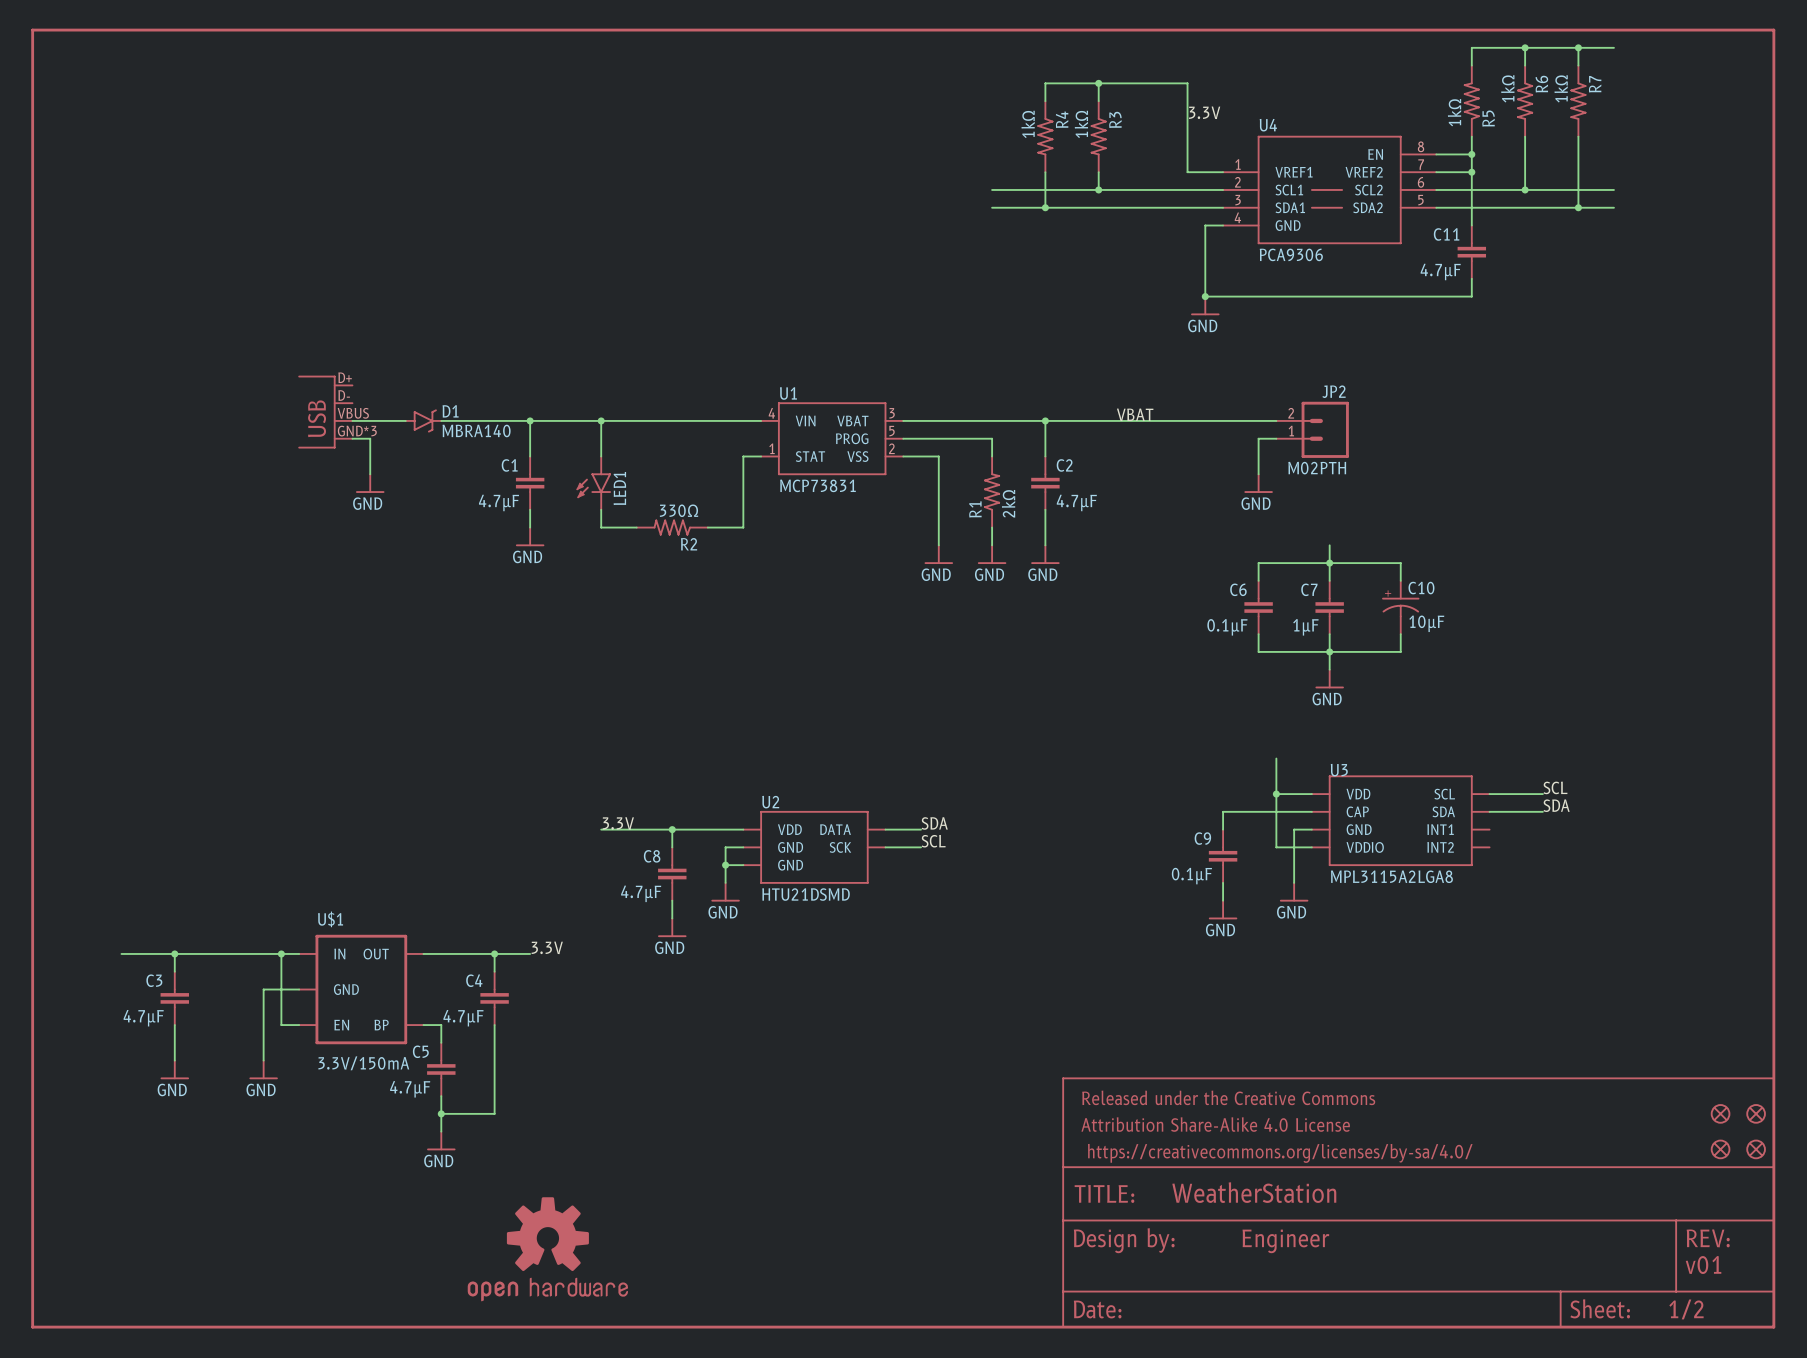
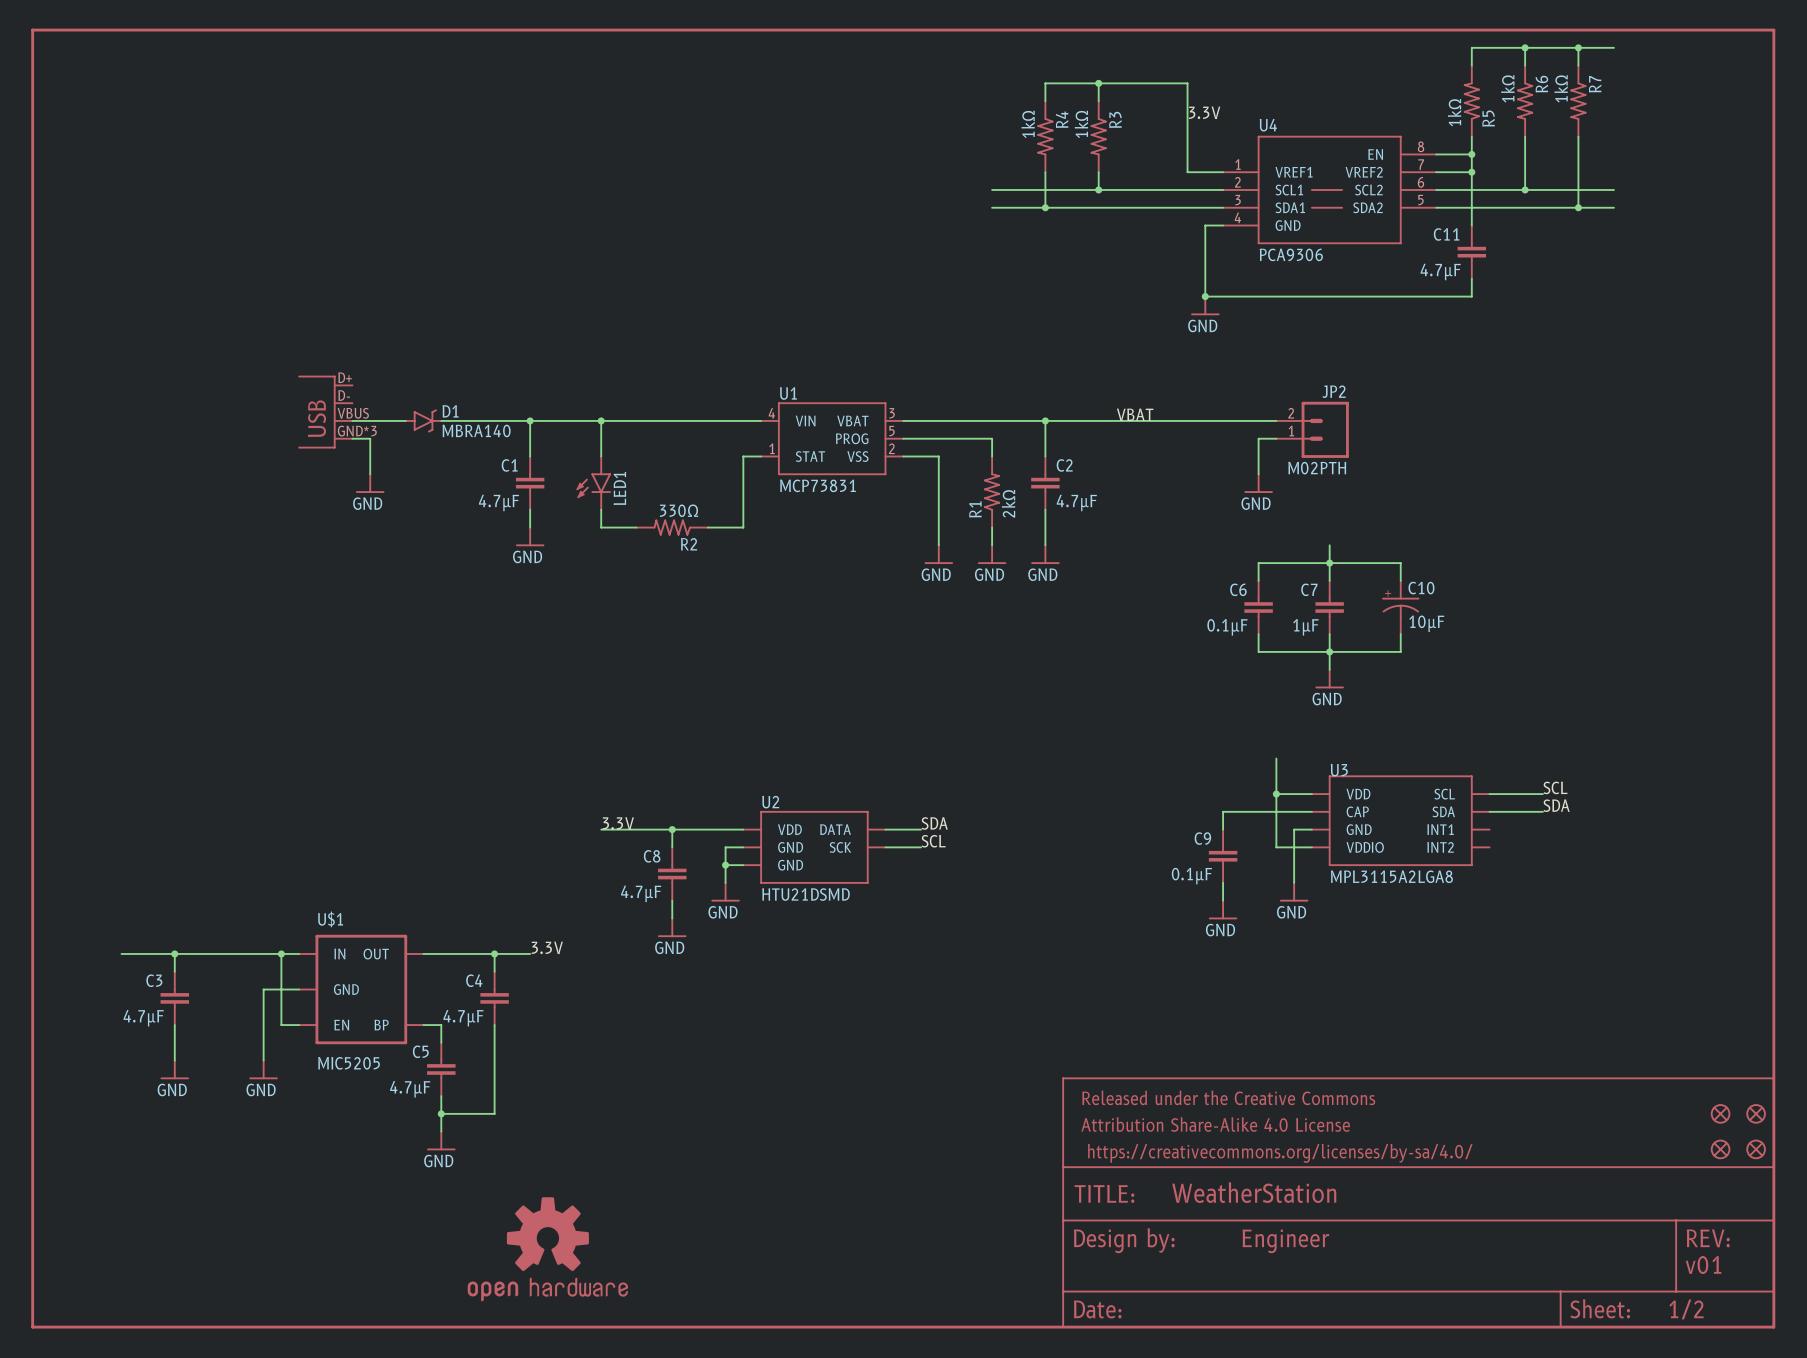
U$1 value: 3.3V/150mA (363, 1063) -> MIC5205 (349, 1063)

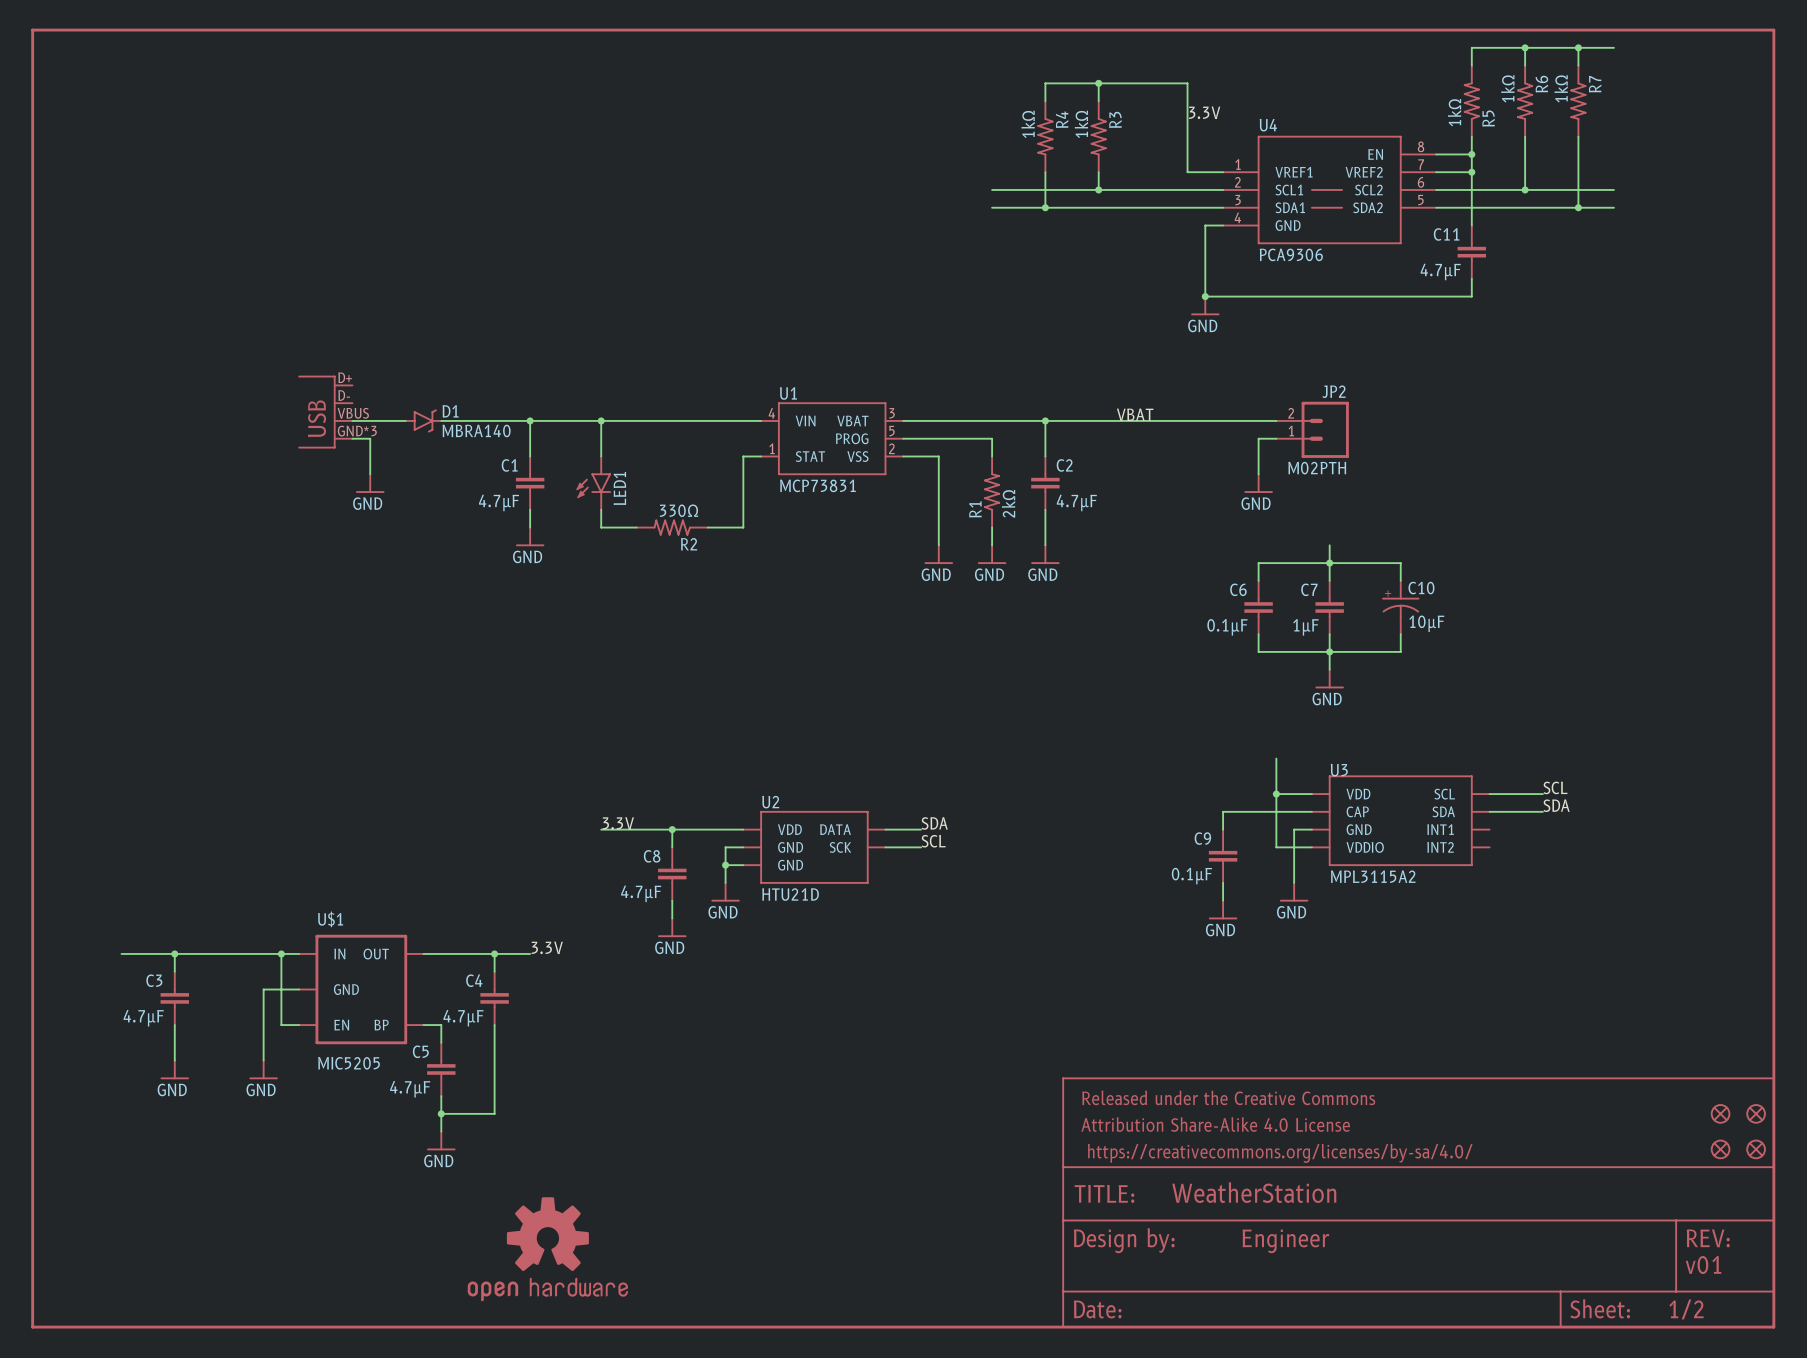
U3 value: MPL3115A2LGA8 (1391, 876) -> MPL3115A2 (1373, 876)
U2 value: HTU21DSMD (806, 894) -> HTU21D (790, 894)

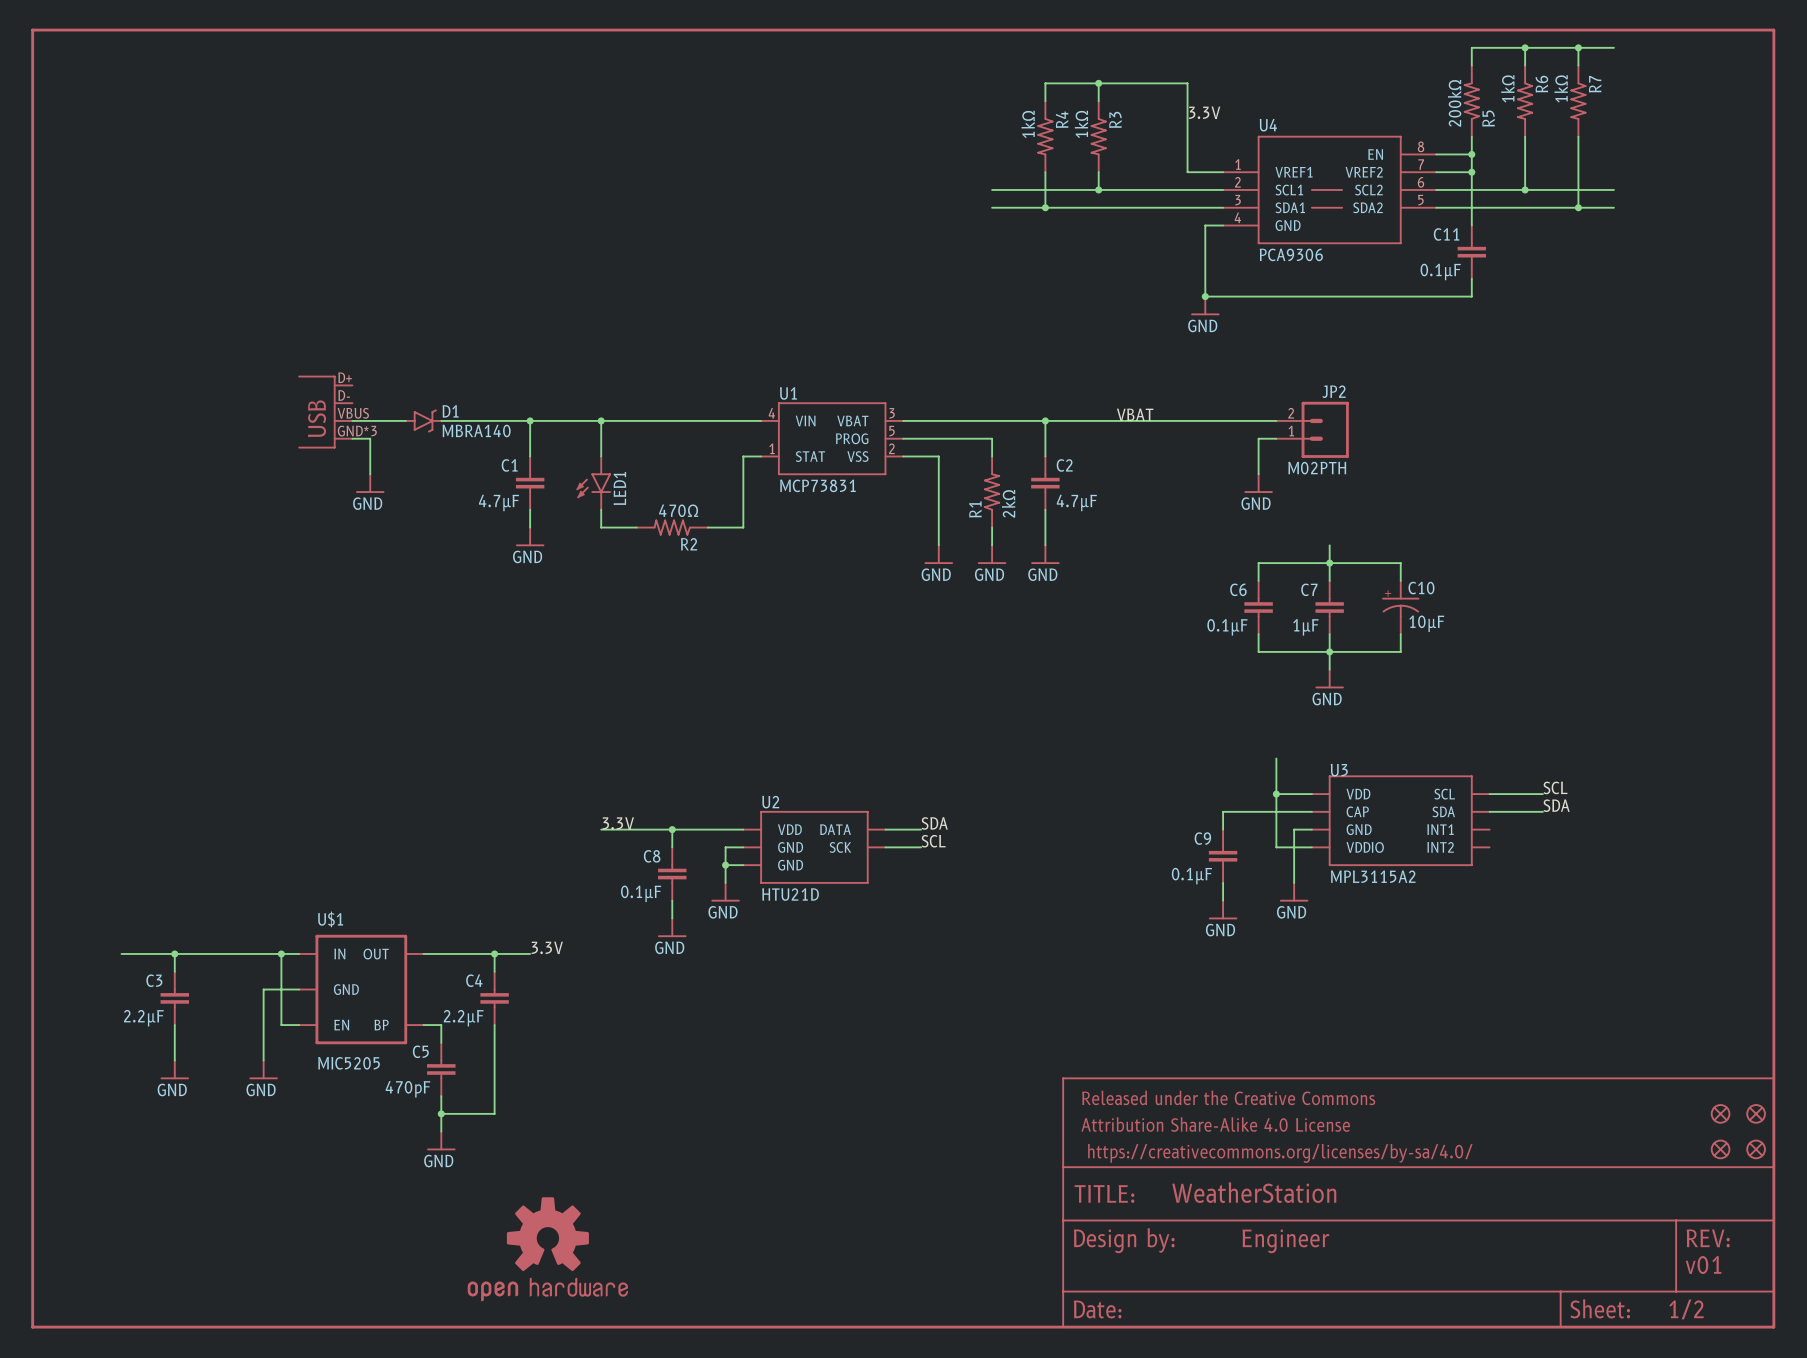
R5 value: 1kΩ (1454, 112) -> 200kΩ (1454, 103)
C11 value: 4.7µF (1440, 271) -> 0.1µF (1440, 271)
R2 value: 330Ω (679, 510) -> 470Ω (678, 510)
C8 value: 4.7µF (641, 893) -> 0.1µF (641, 893)
C3 value: 4.7µF (143, 1018) -> 2.2µF (143, 1018)
C4 value: 4.7µF (463, 1018) -> 2.2µF (463, 1018)
C5 value: 4.7µF (410, 1089) -> 470pF (407, 1089)

